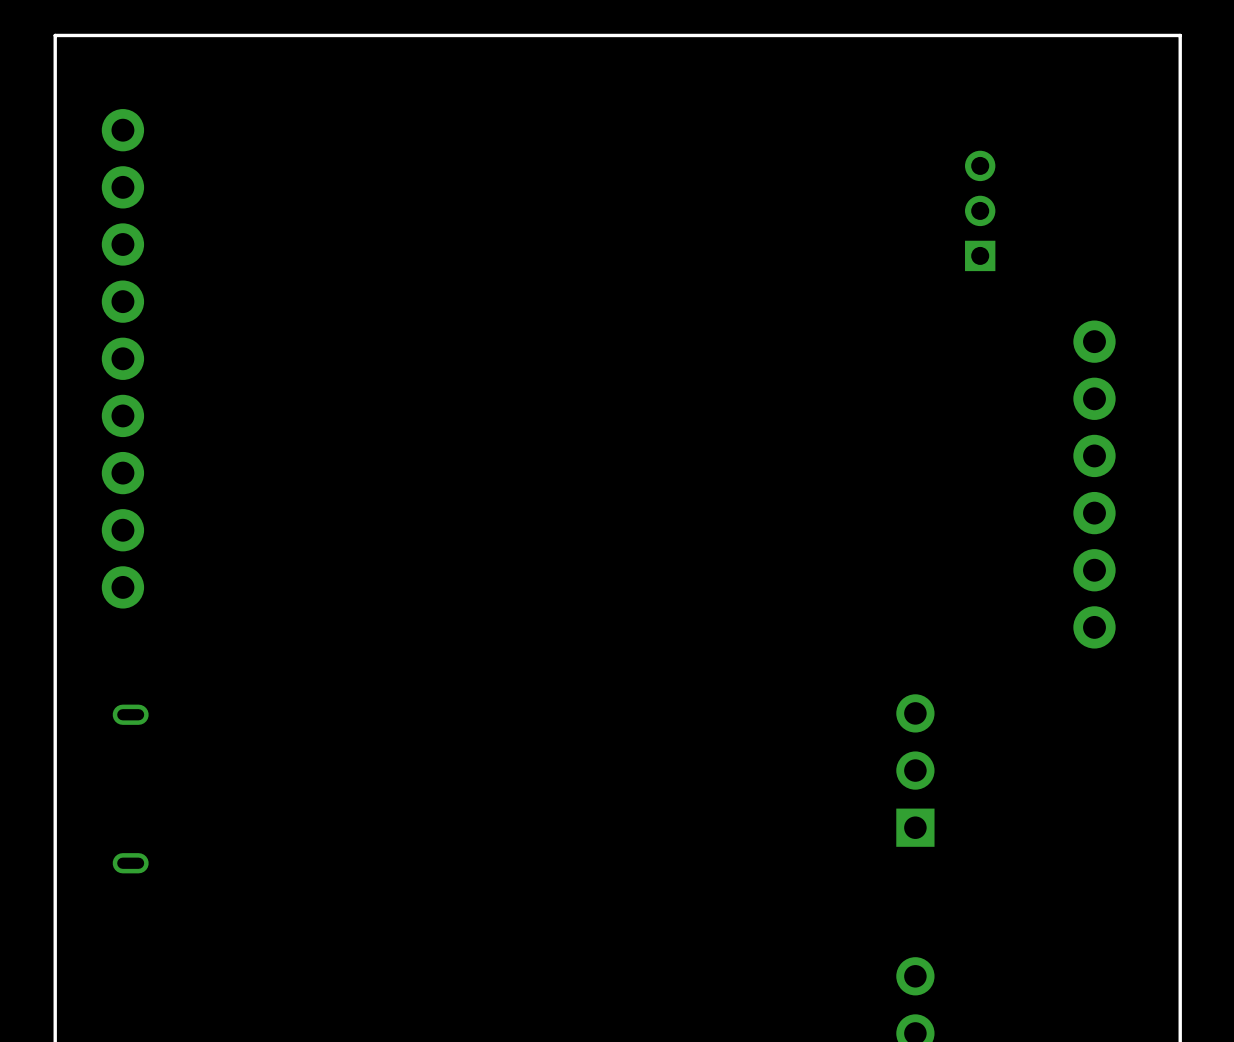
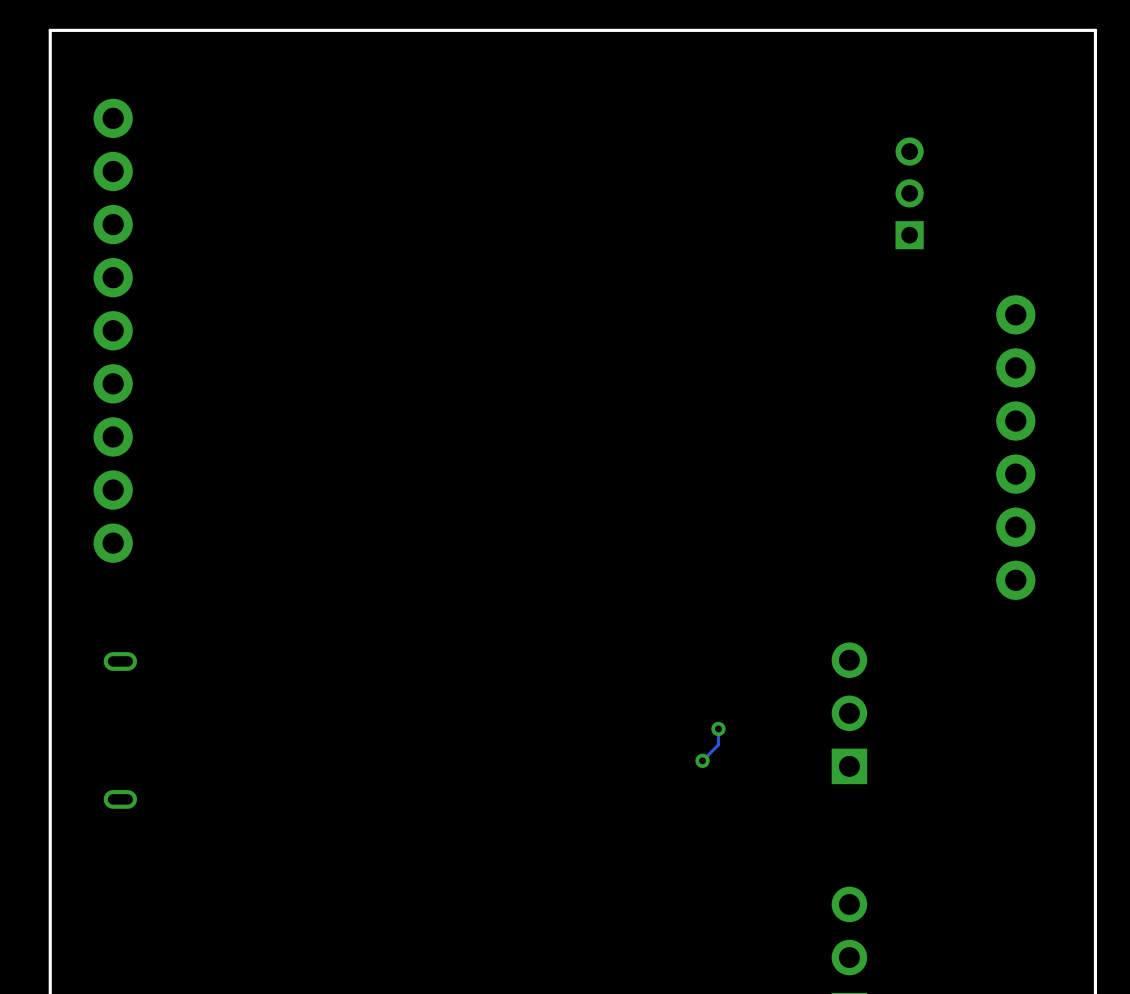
track: none -> (718, 728) (718, 744) (702, 760)
via: none -> (718, 728)
via: none -> (702, 760)

